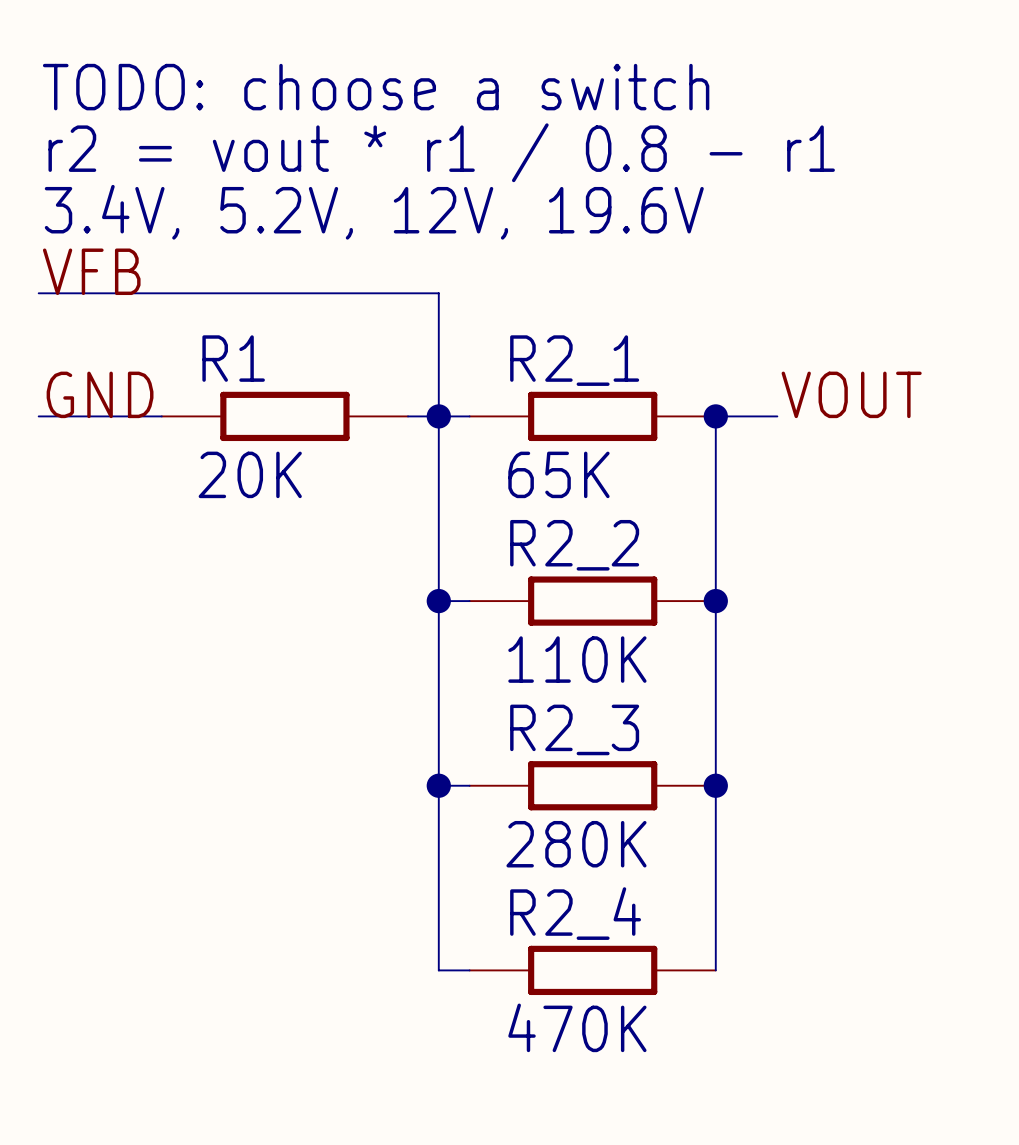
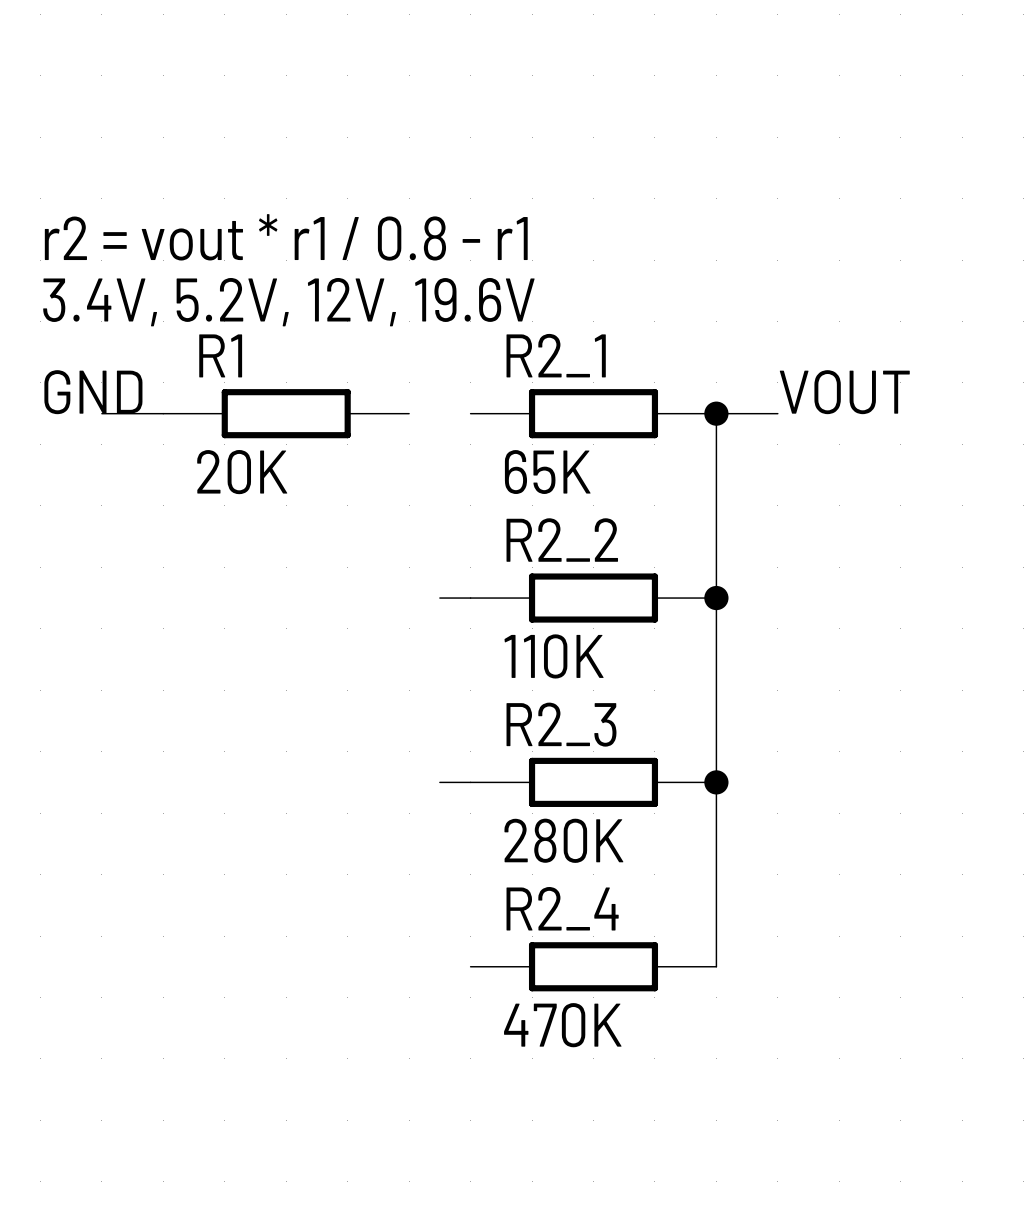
text: TODO: choose a switch (376, 87) -> none
text position: r2 = vout * r1 / 0.8 - r1 (441, 152) -> r2 = vout * r1 / 0.8 - r1 (286, 237)
text position: 3.4V, 5.2V, 12V, 19.6V (374, 212) -> 3.4V, 5.2V, 12V, 19.6V (288, 302)
label: VFB (91, 271) -> none
wire: (38, 293) (438, 293) (438, 970) (469, 970) -> none
wire: (38, 416) (100, 416) -> none
wire: (408, 416) (469, 416) -> none
junction: (438, 416) -> none
junction: (438, 601) -> none
junction: (438, 785) -> none

